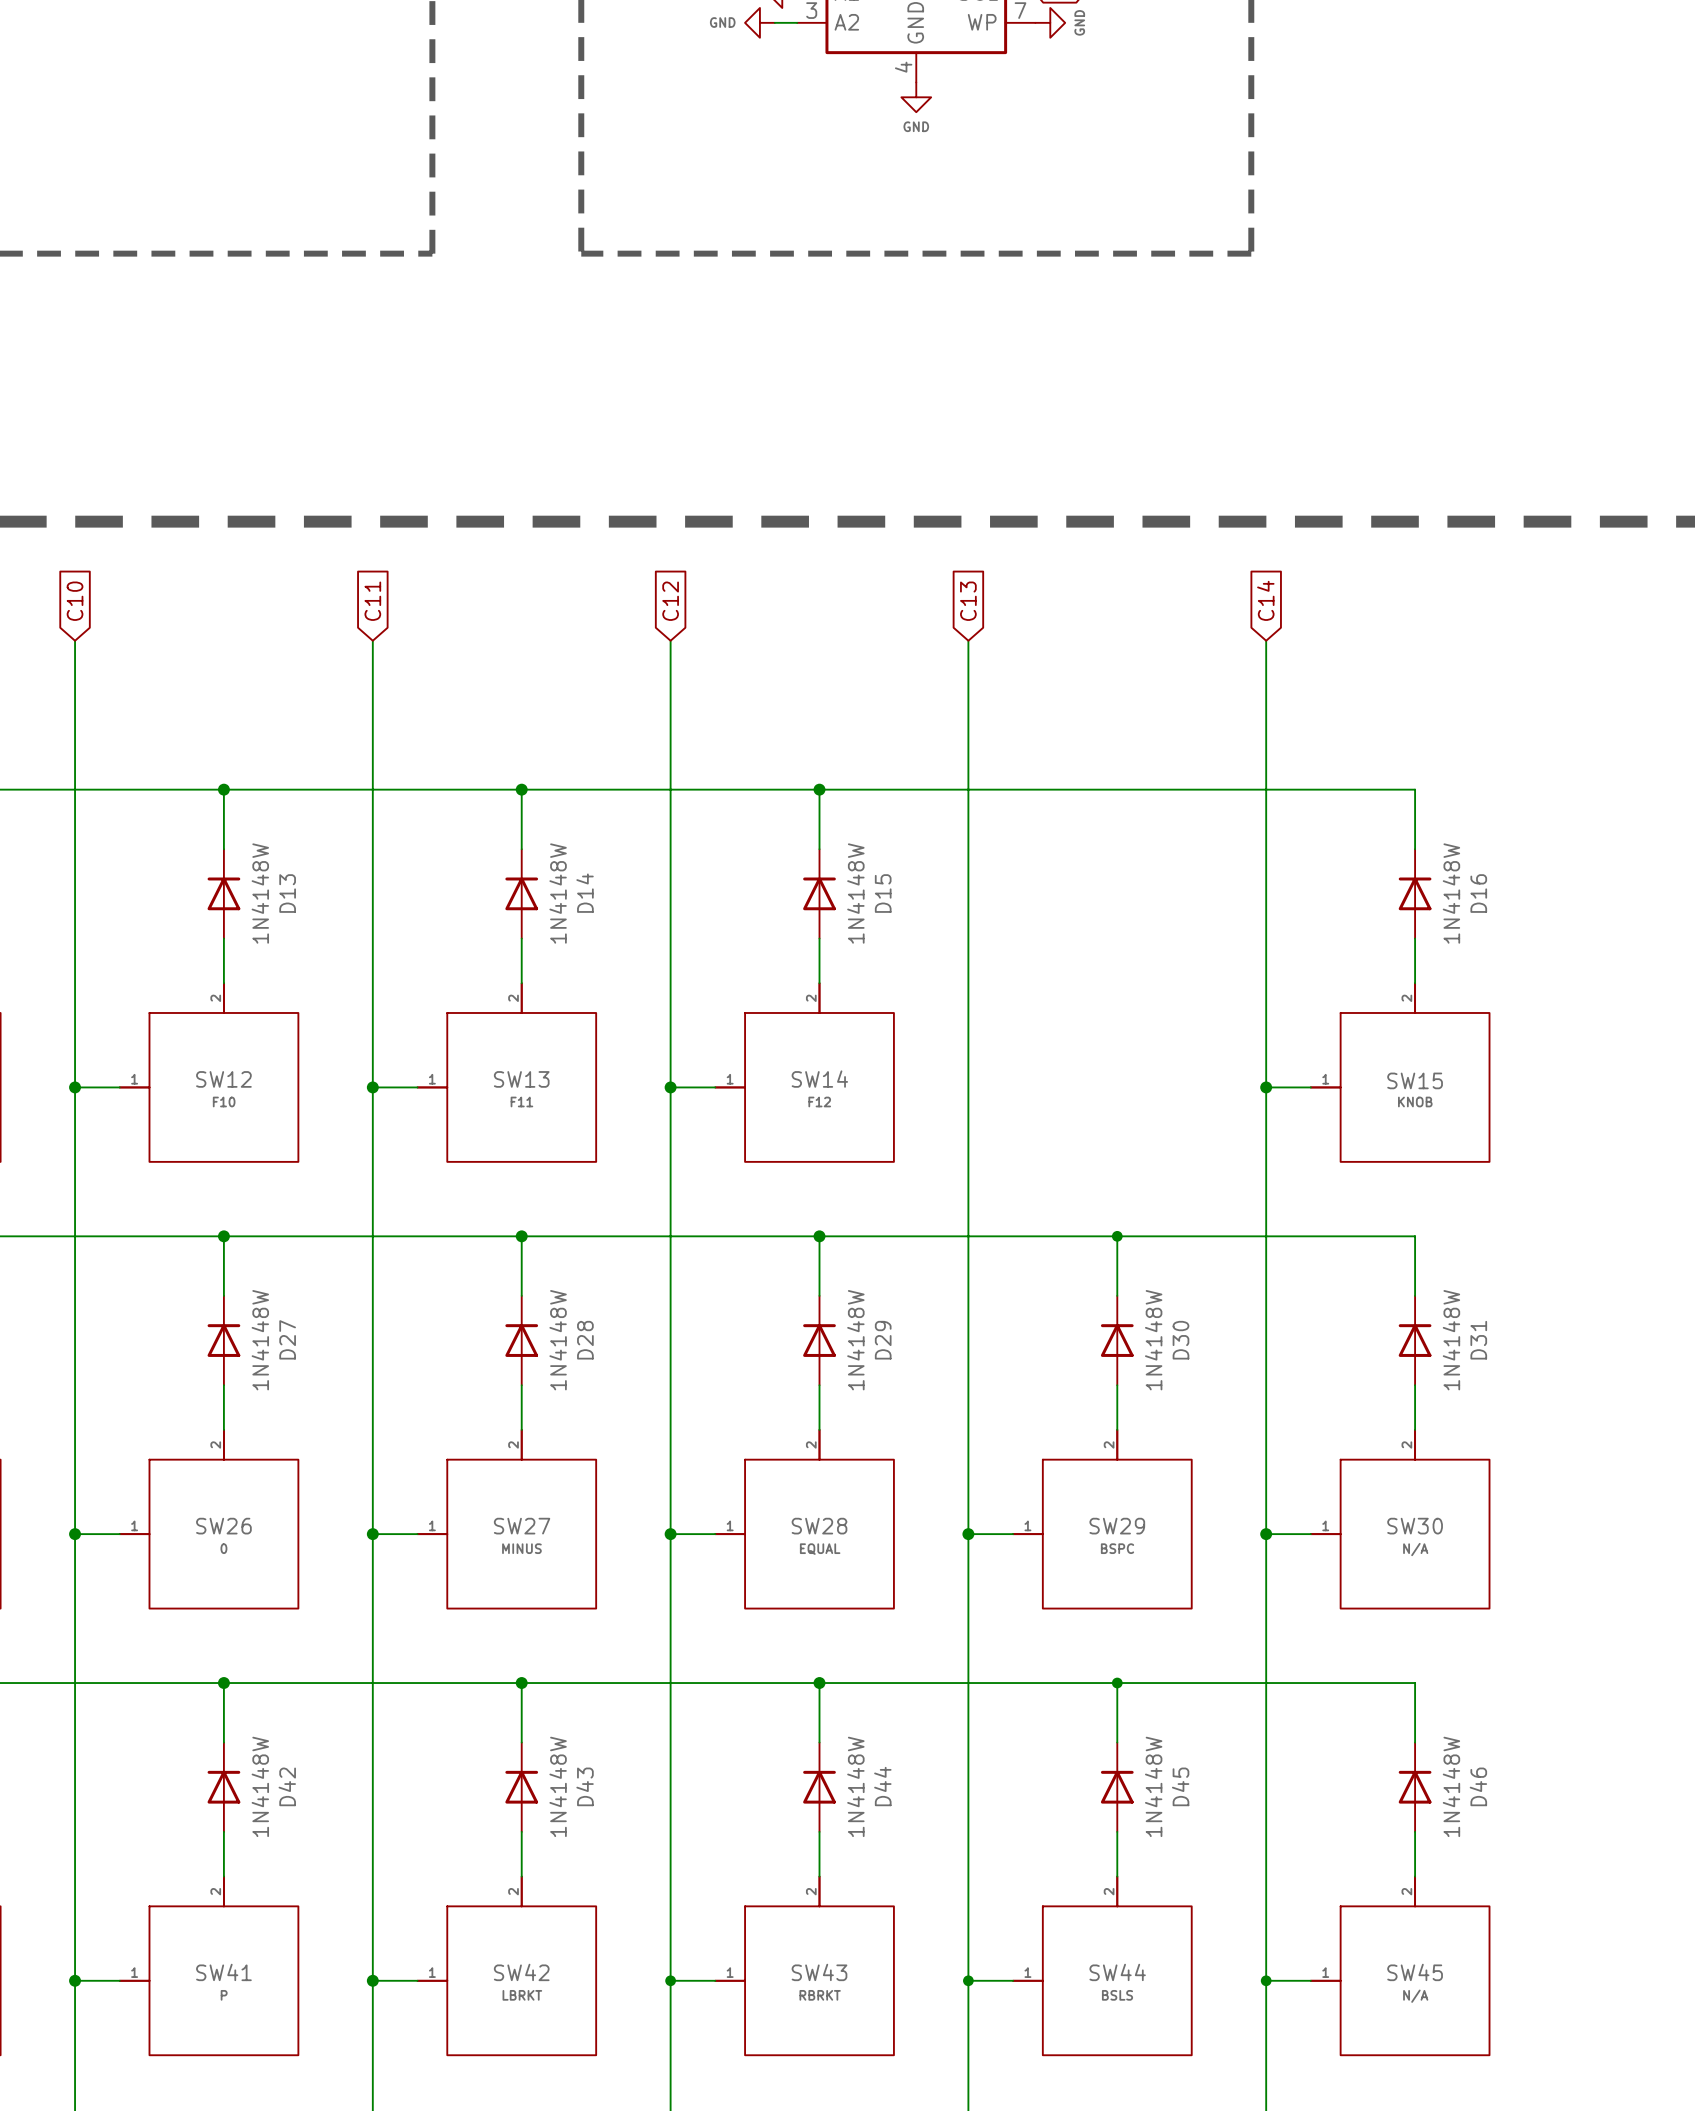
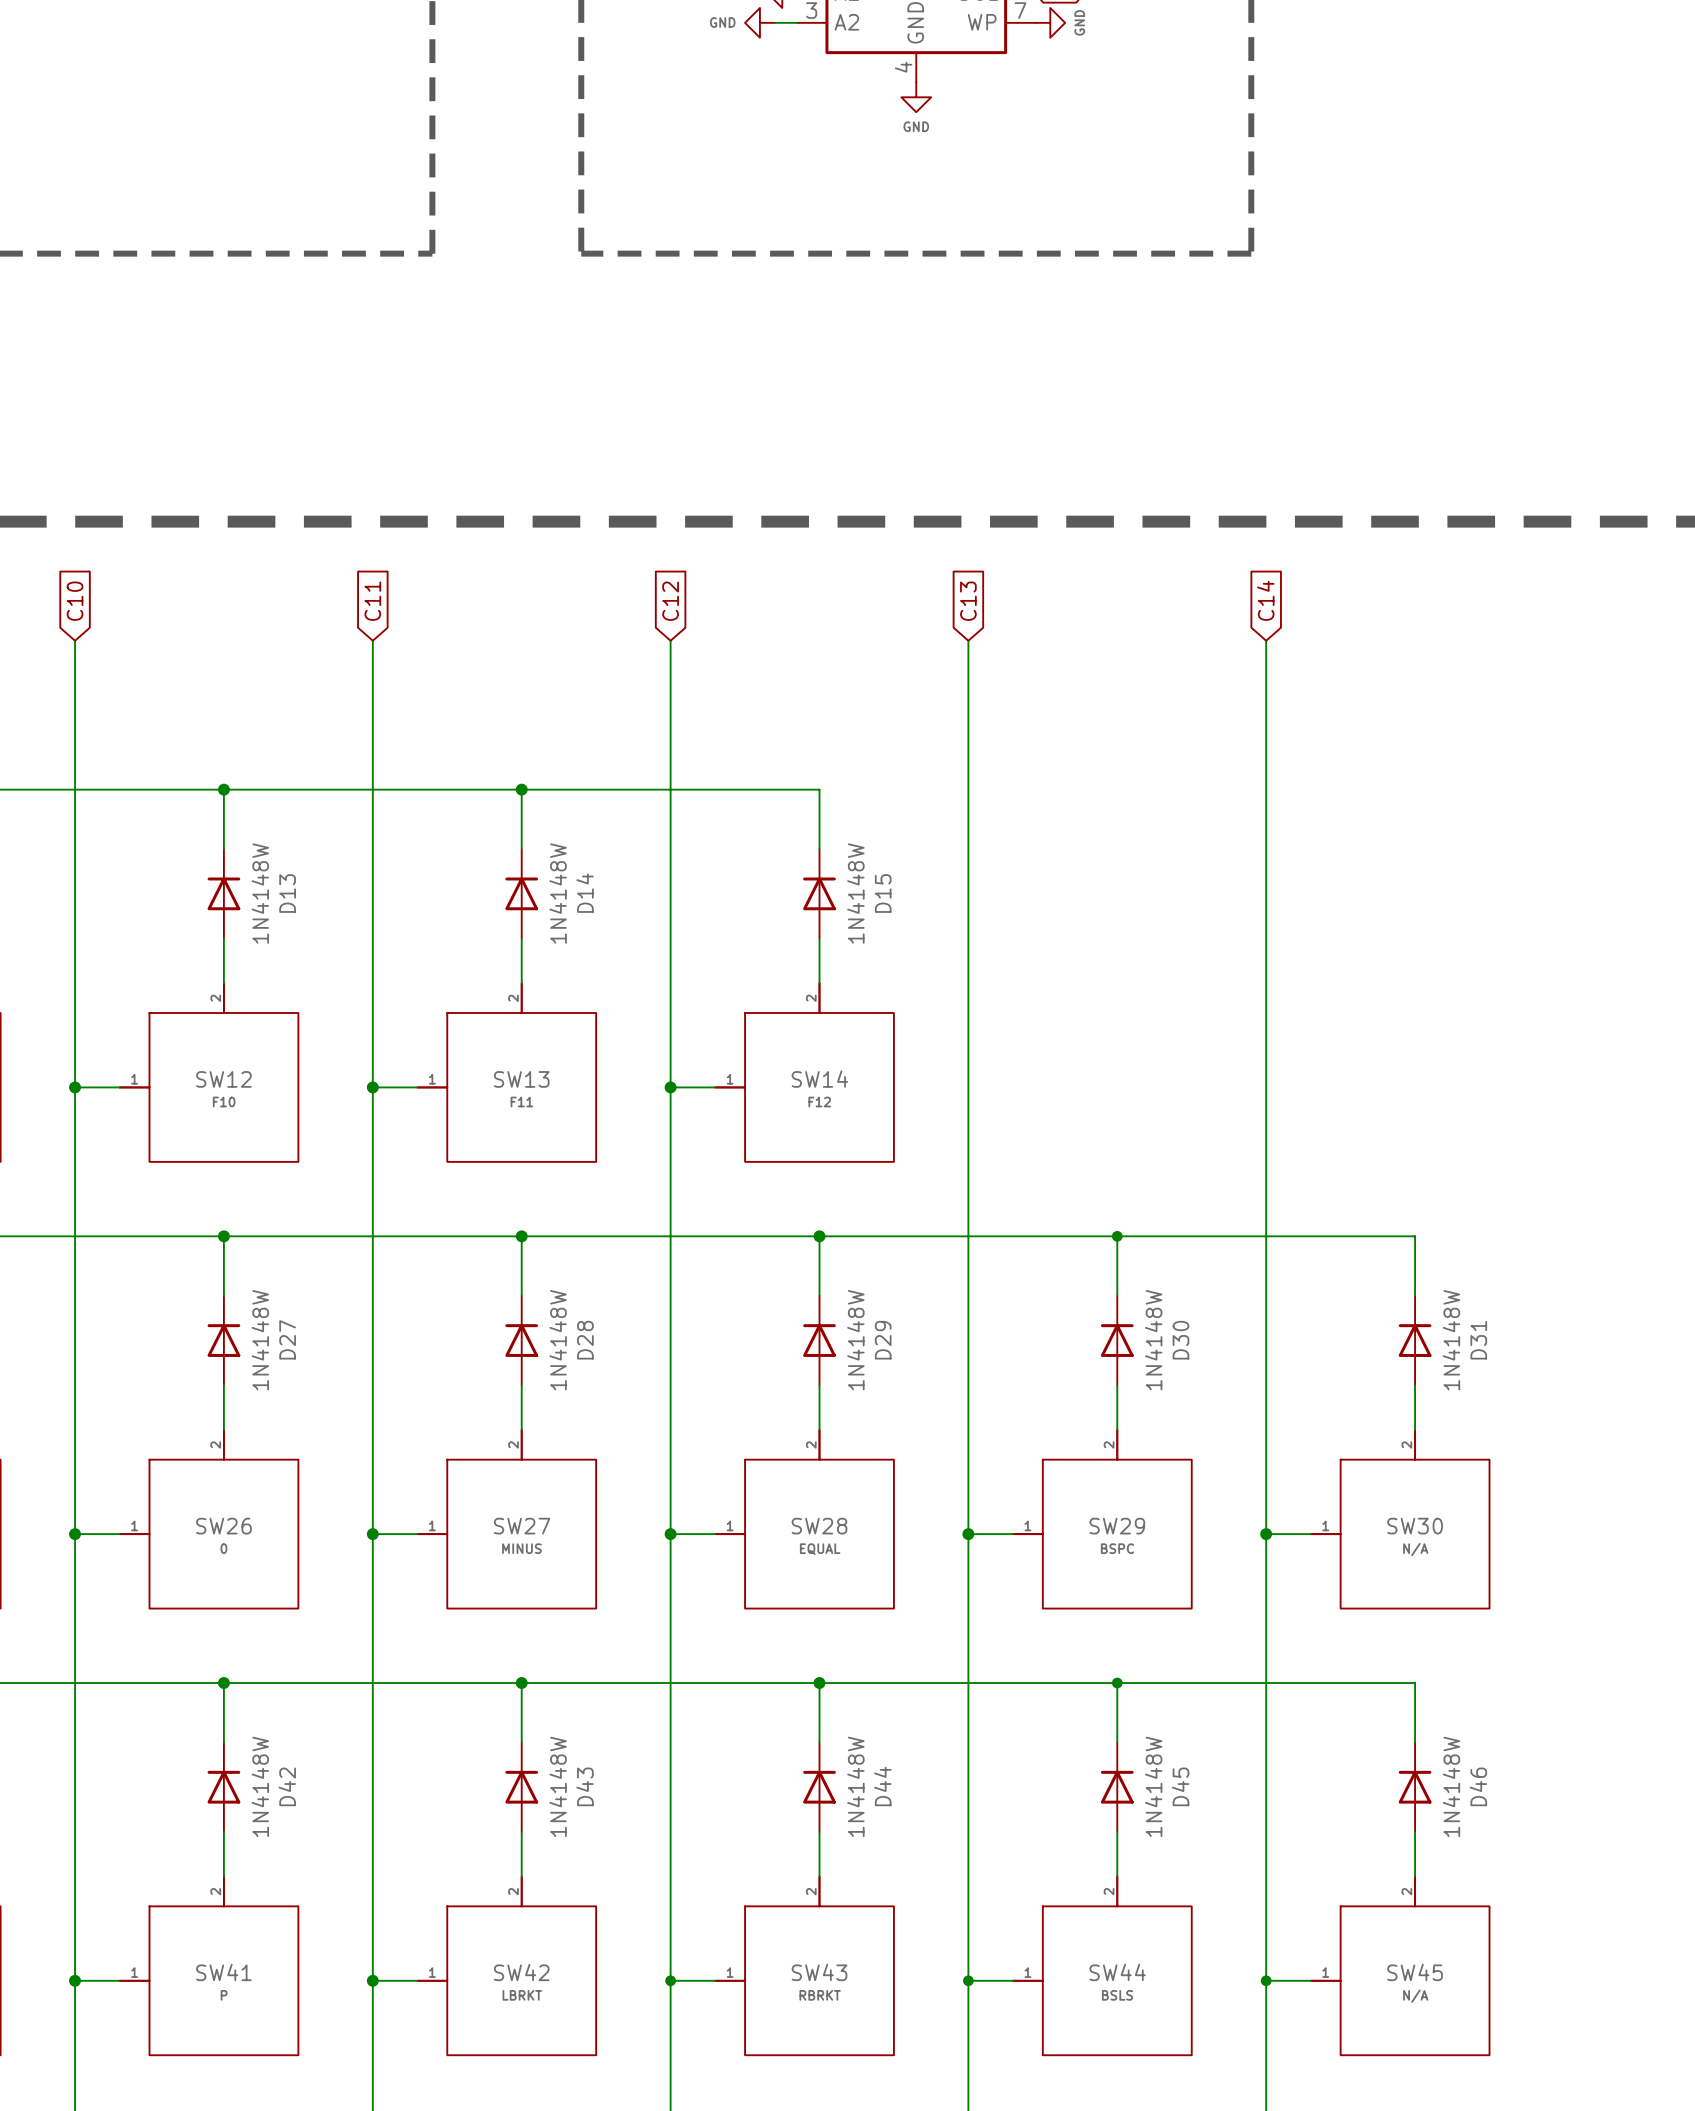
wire: (819, 789) (1415, 789) (1415, 849) -> none
junction: (819, 789) -> none
D16: 1N4148W (1415, 893) -> none
wire: (1415, 938) (1415, 983) -> none
SW15: (1400, 1072) -> none
wire: (1266, 1087) (1310, 1087) -> none
junction: (1266, 1087) -> none

